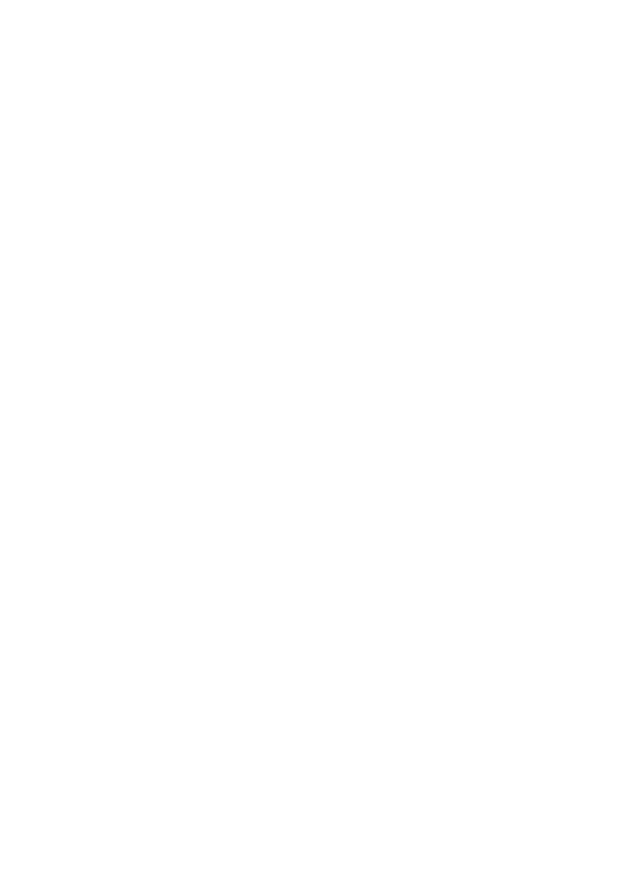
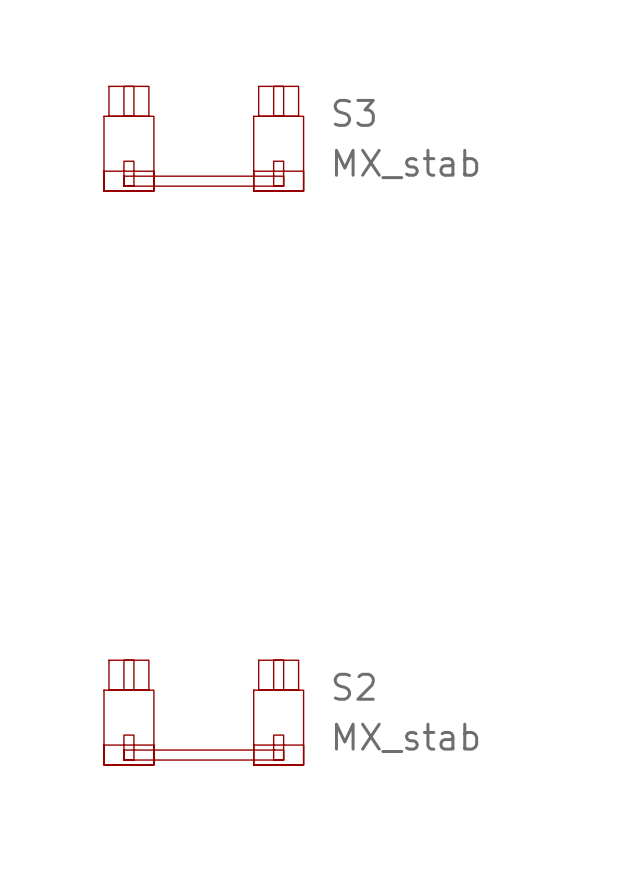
S3: none -> MX_stab (203, 138)
S2: none -> MX_stab (203, 712)

